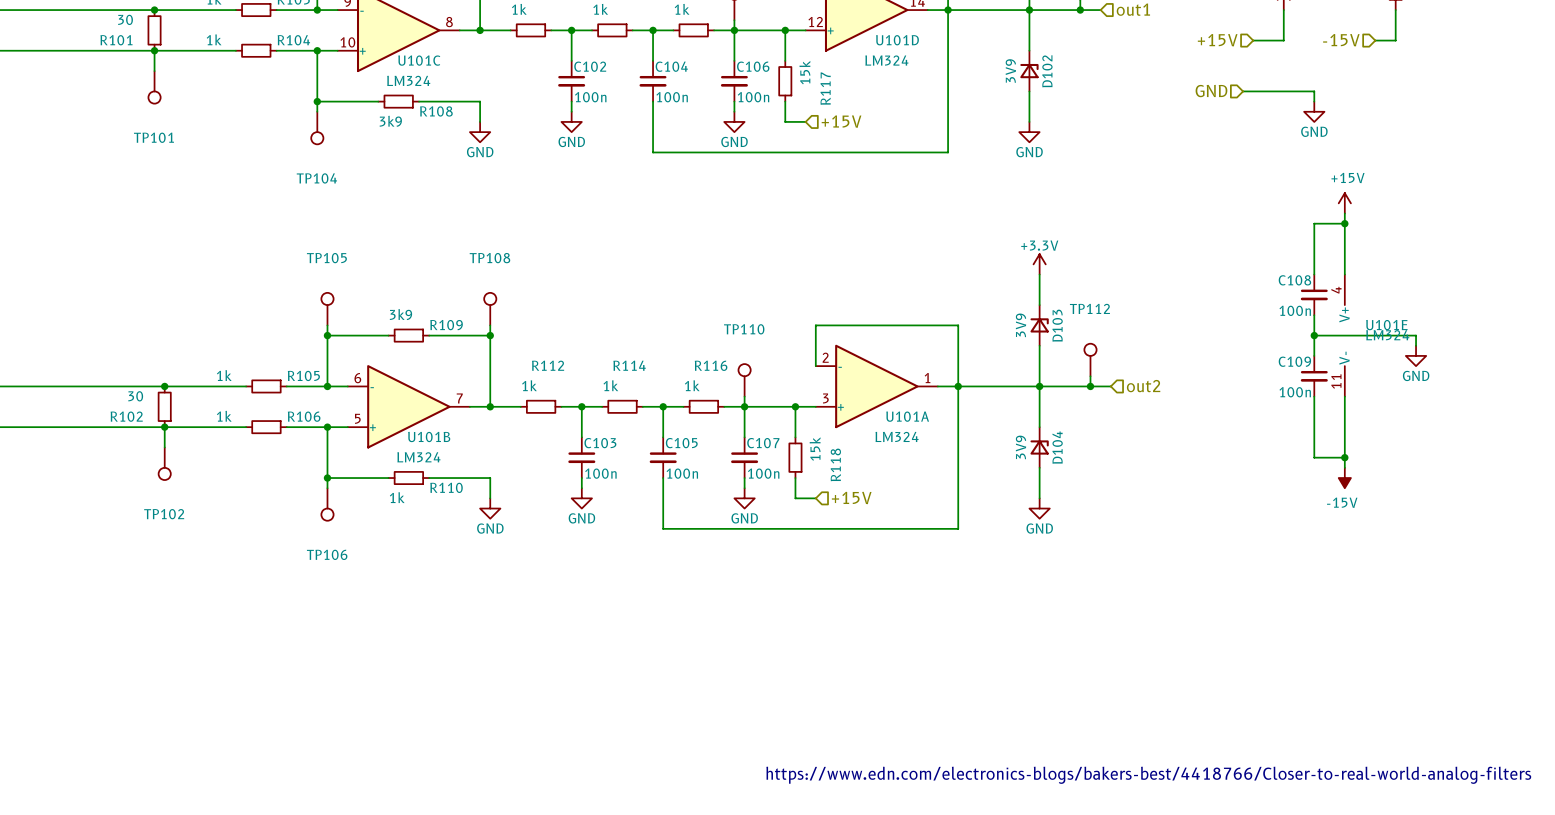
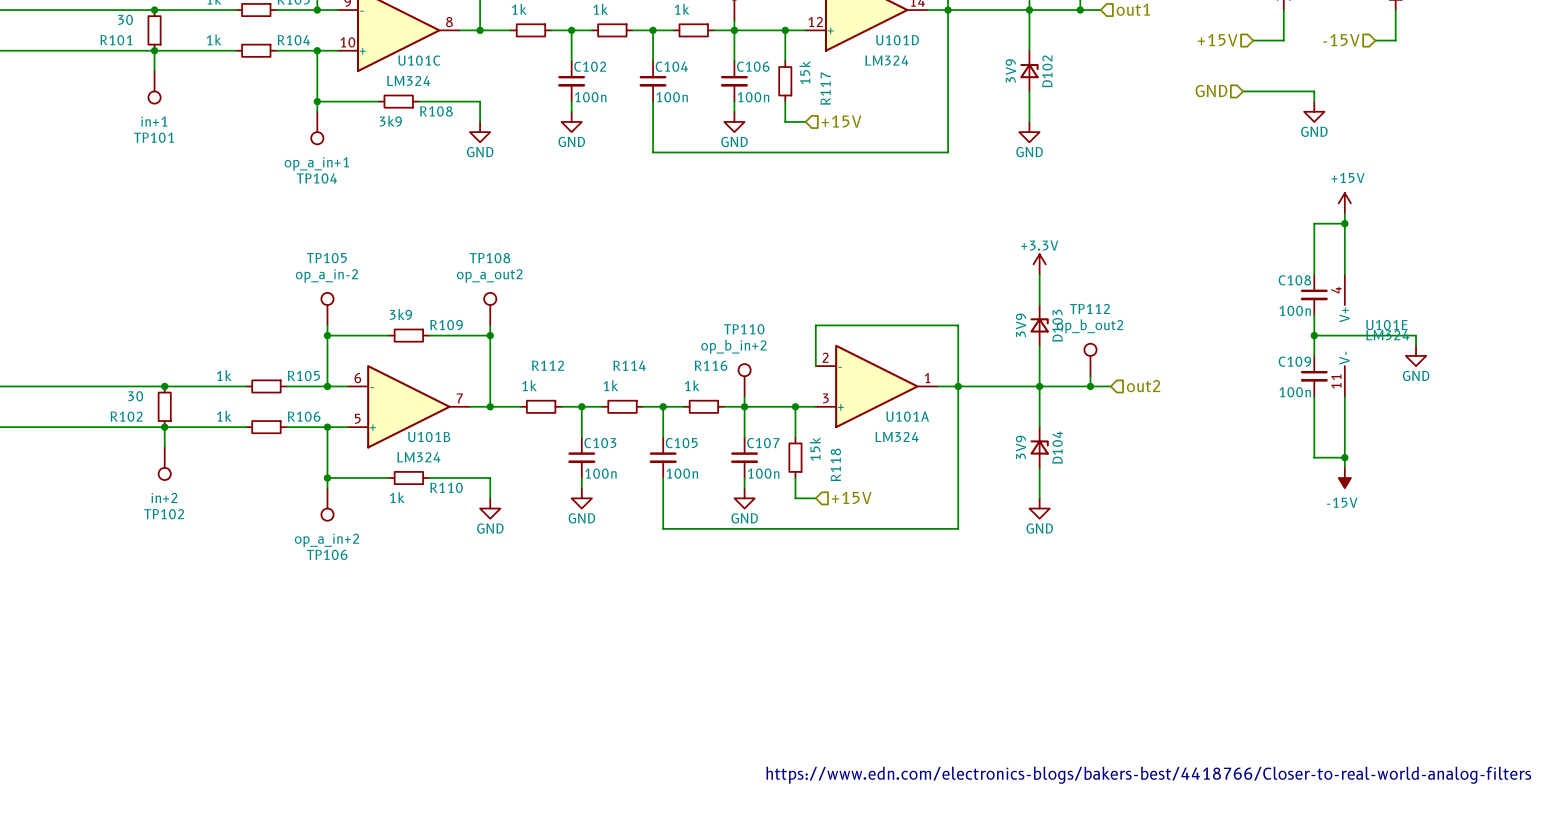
TP101 value: none -> in+1 (154, 121)
TP104 value: none -> op_a_in+1 (316, 163)
TP105 value: none -> op_a_in-2 (327, 275)
TP108 value: none -> op_a_out2 (489, 275)
TP112 value: none -> op_b_out2 (1090, 326)
TP110 value: none -> op_b_in+2 (733, 346)
TP102 value: none -> in+2 (164, 497)
TP106 value: none -> op_a_in+2 (327, 540)

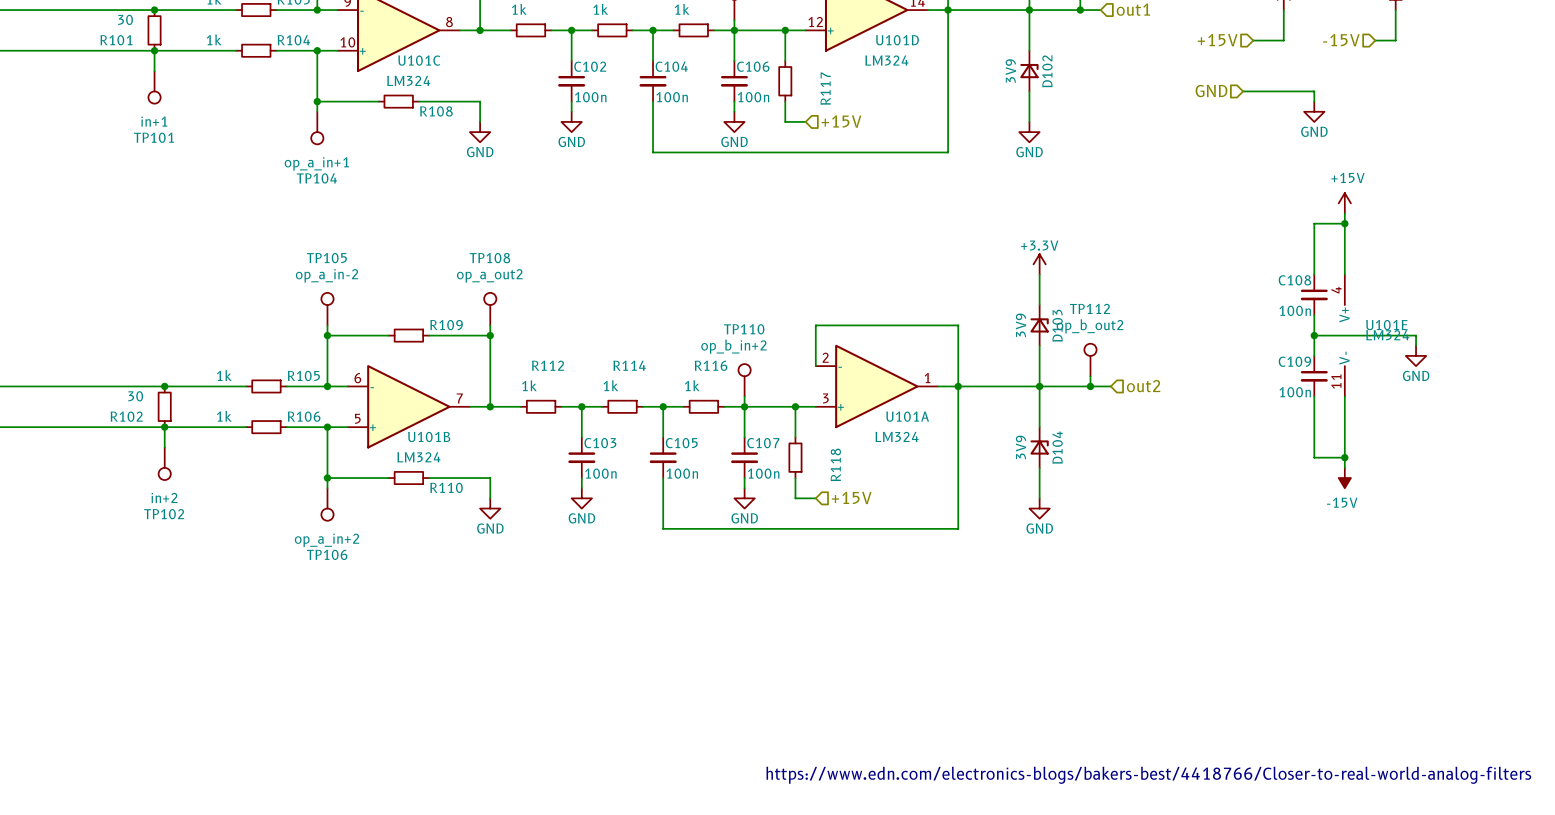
R117 value: 15k (804, 72) -> none
R108 value: 3k9 (390, 121) -> none
R109 value: 3k9 (400, 314) -> none
R118 value: 15k (815, 449) -> none
R110 value: 1k (397, 497) -> none

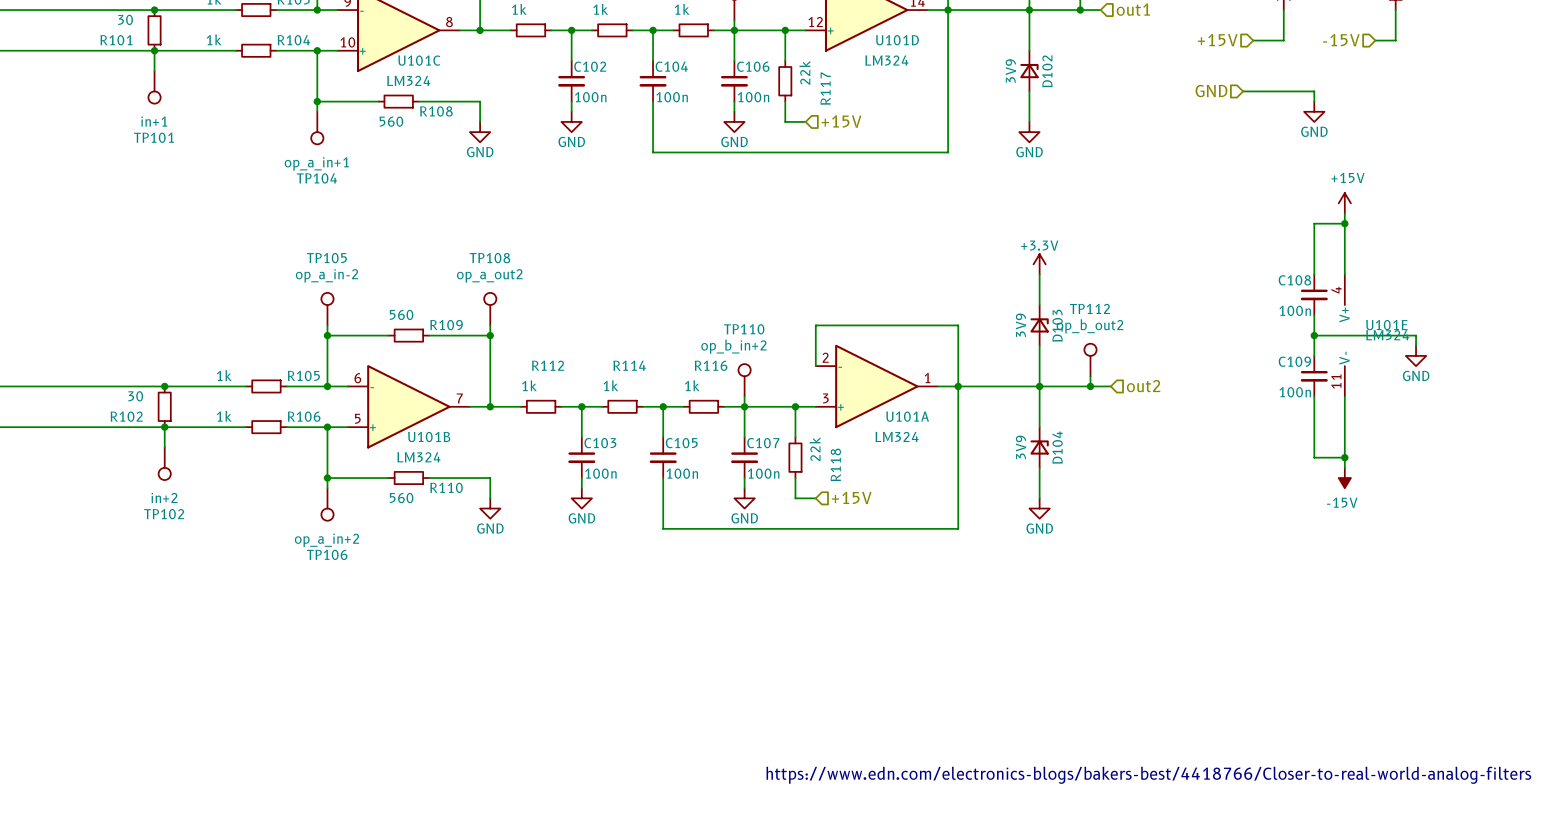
R117 value: none -> 22k (804, 72)
R108 value: none -> 560 (391, 121)
R109 value: none -> 560 (401, 314)
R118 value: none -> 22k (815, 449)
R110 value: none -> 560 (401, 498)

